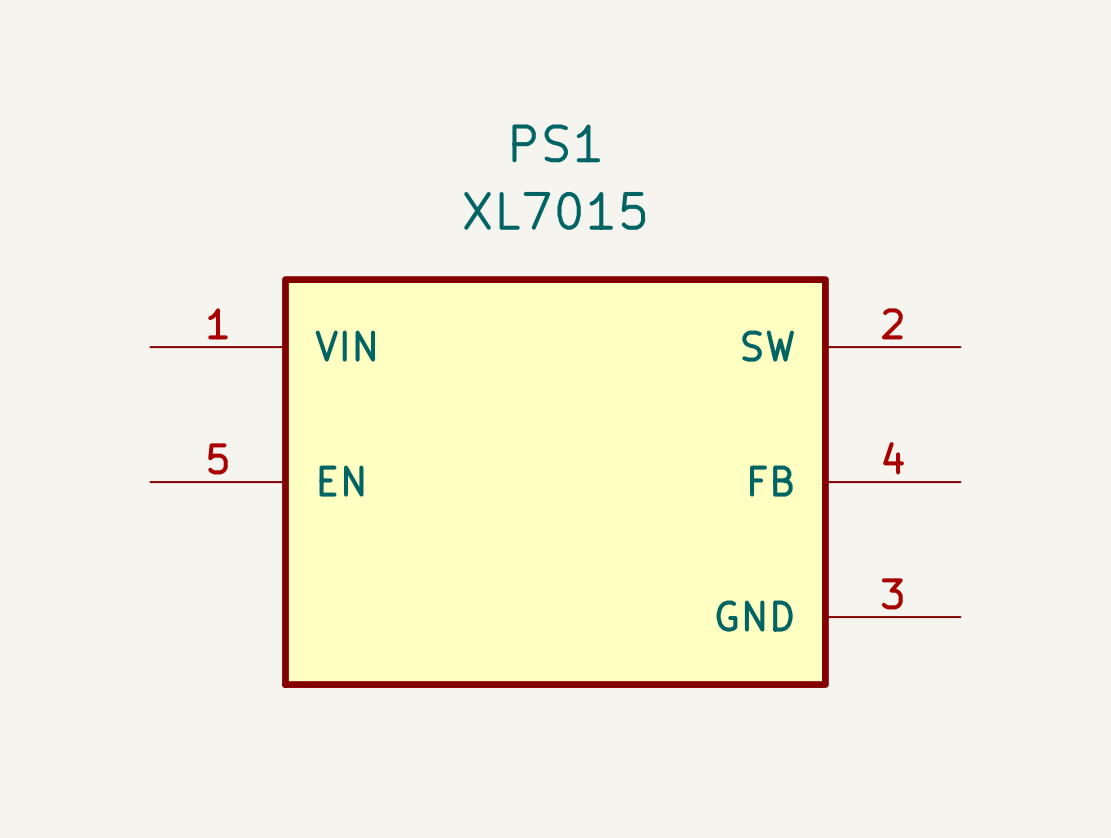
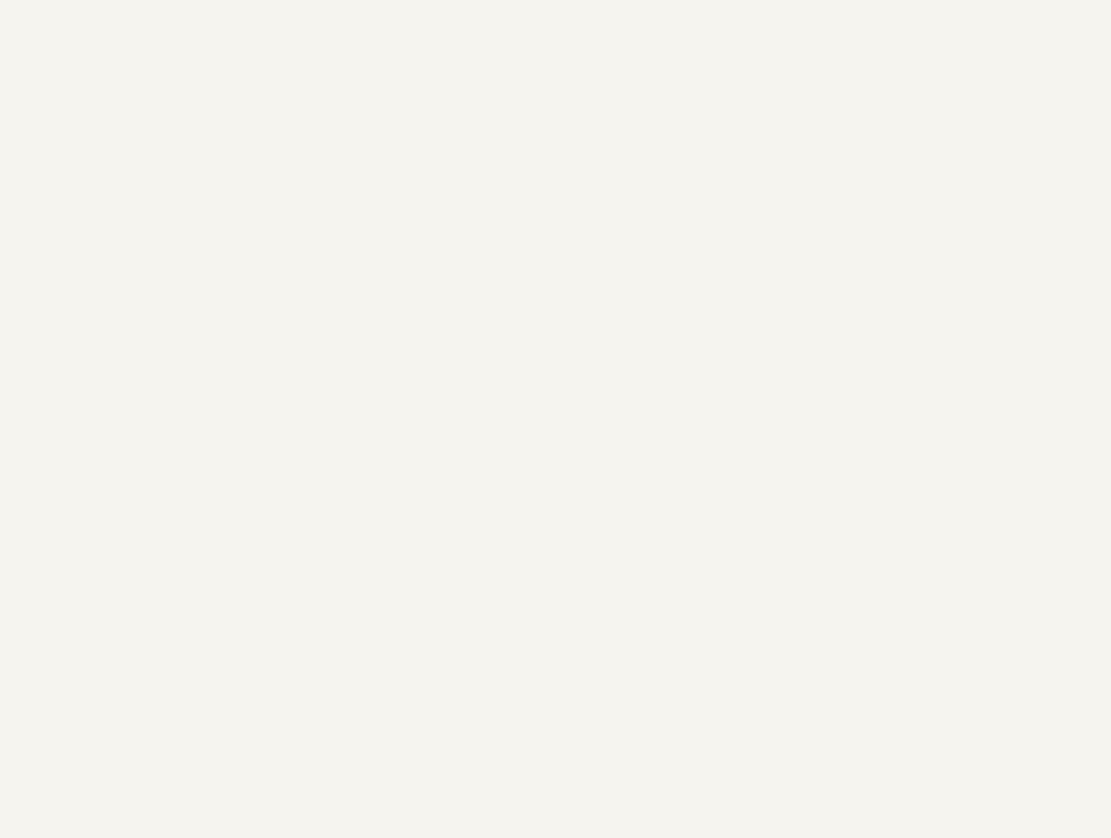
PS1: XL7015 (555, 482) -> none

